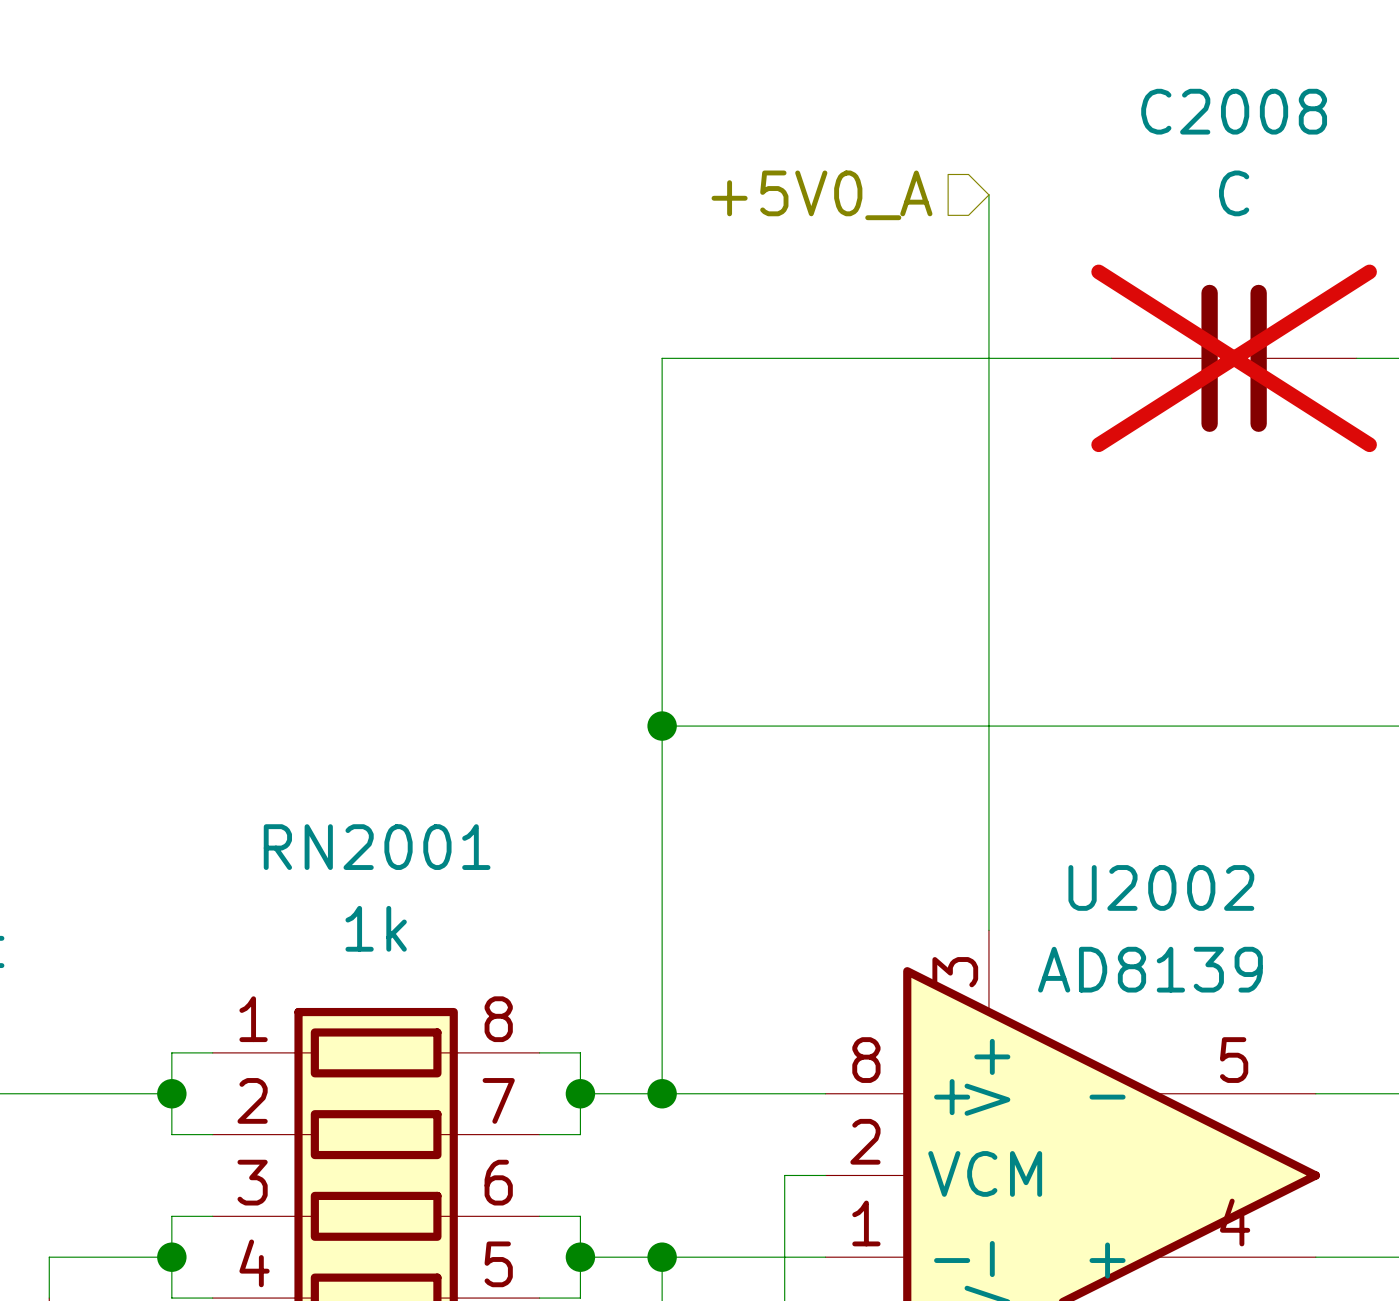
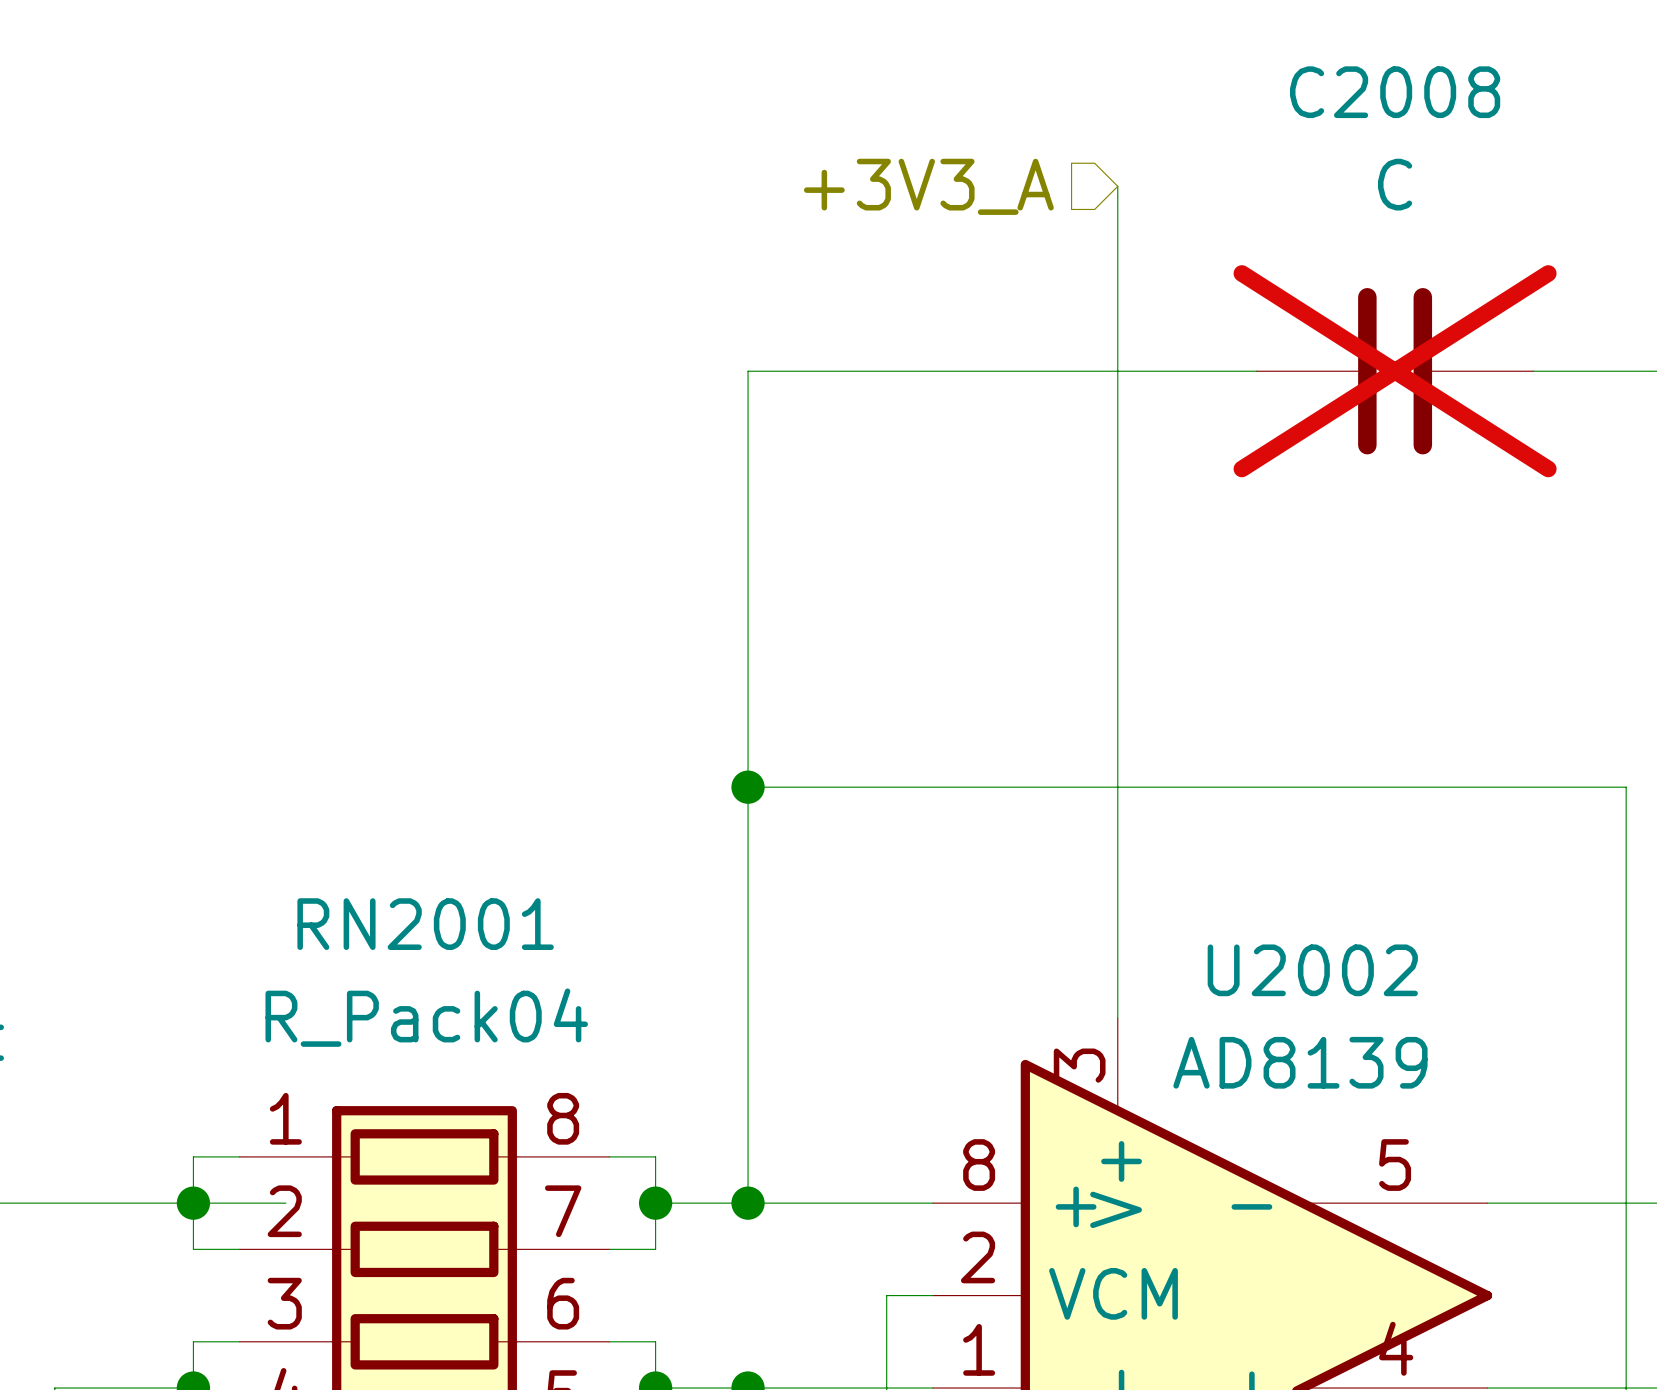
hierarchical label: +5V0_A (822, 195) -> +3V3_A (928, 186)
RN2001 value: 1k (376, 928) -> R_Pack04 (426, 1017)
wire: none -> (193, 1203) (285, 1203)

